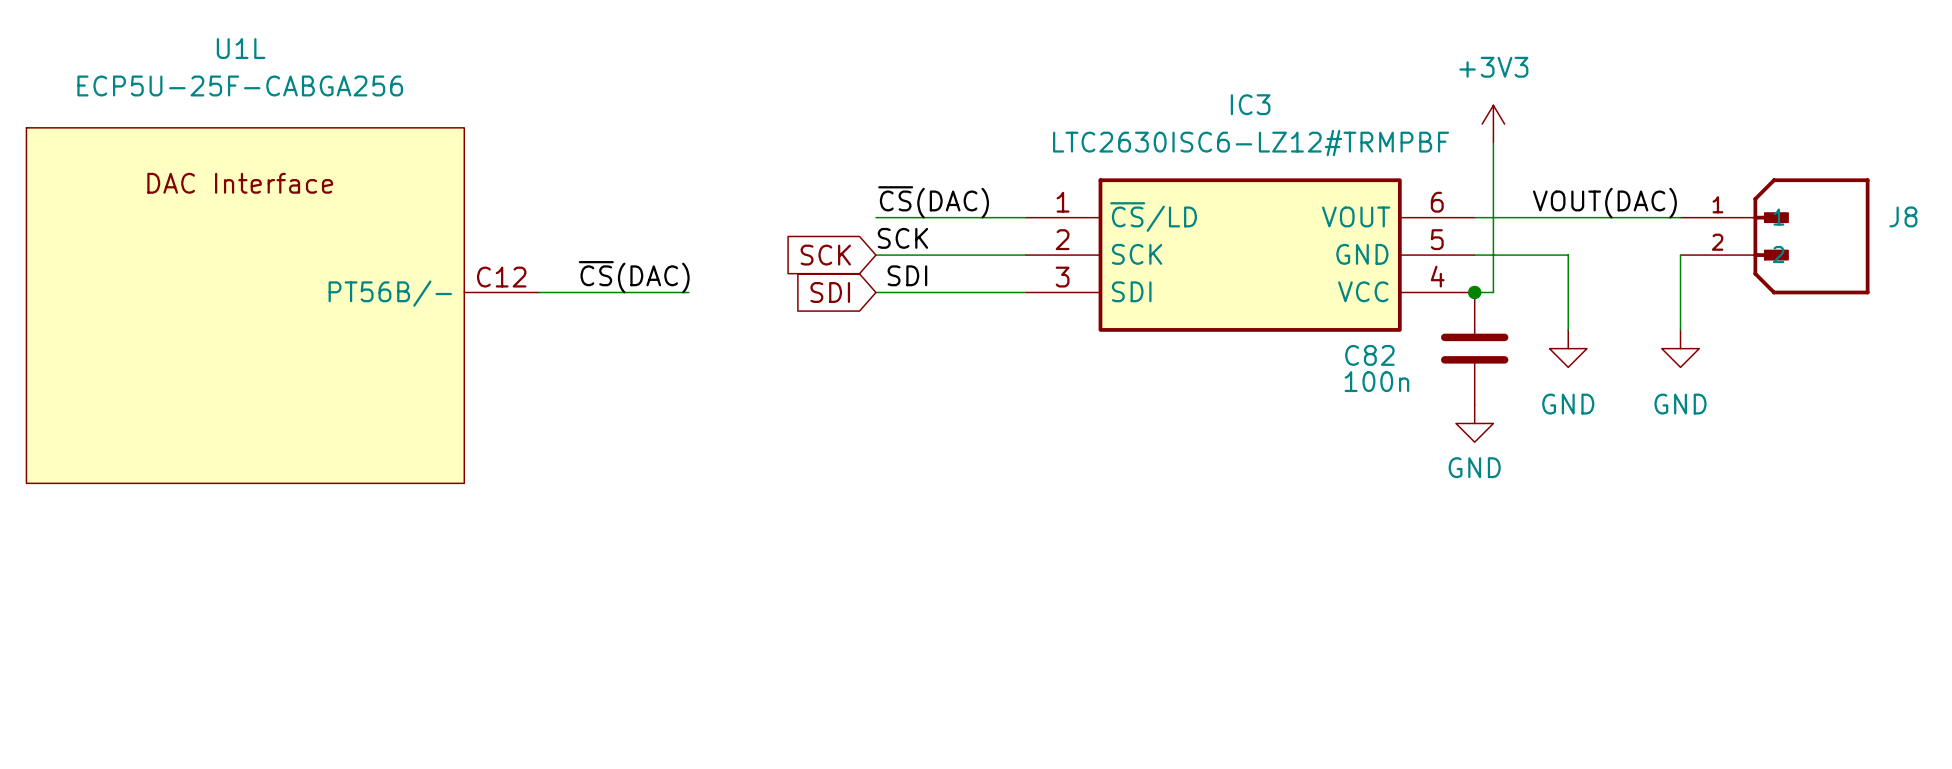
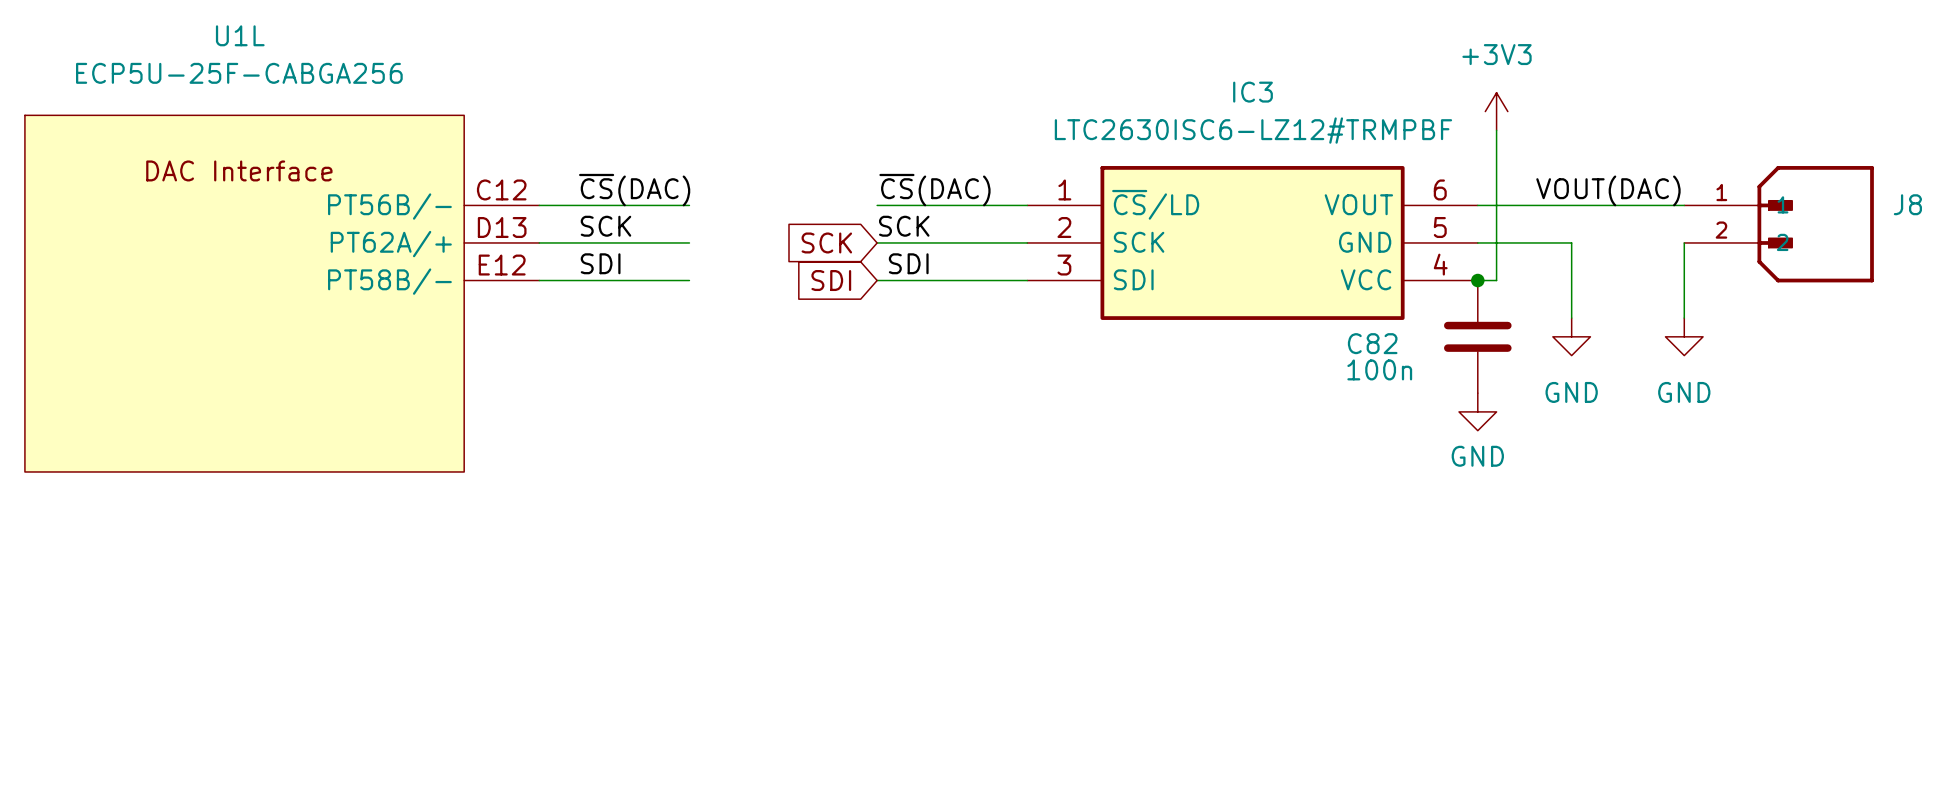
U1L symbol: [26, 127, 607, 746] -> [24, 115, 607, 735]
label: none -> ~{CS}(DAC) (634, 190)
wire: none -> (539, 205) (689, 205)
label: none -> SCK (605, 226)
wire: none -> (539, 242) (689, 242)
label: ~{CS}(DAC) (634, 277) -> SDI (600, 263)

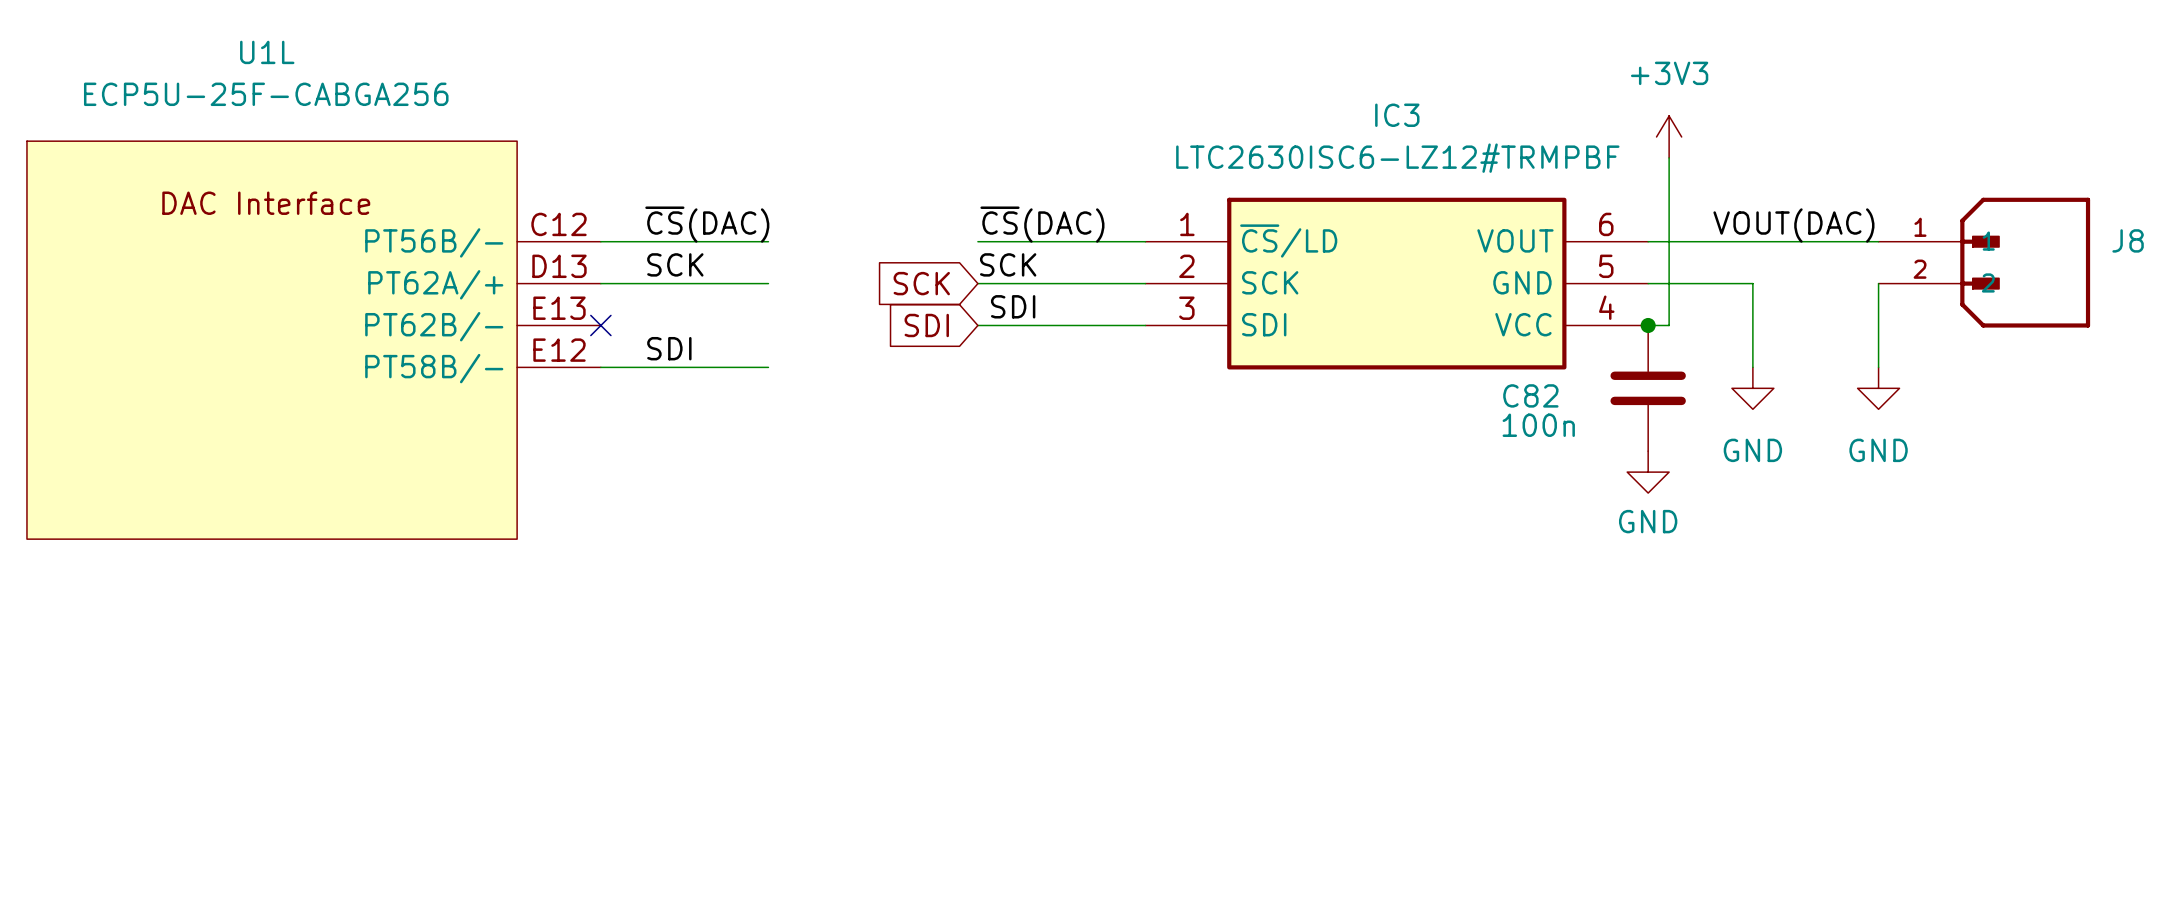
U1L symbol: [24, 115, 607, 735] -> [26, 141, 677, 833]
label position: SDI (600, 263) -> SDI (669, 348)
wire: (539, 280) (689, 280) -> (600, 367) (768, 367)
no-connect mark: none -> (600, 325)

